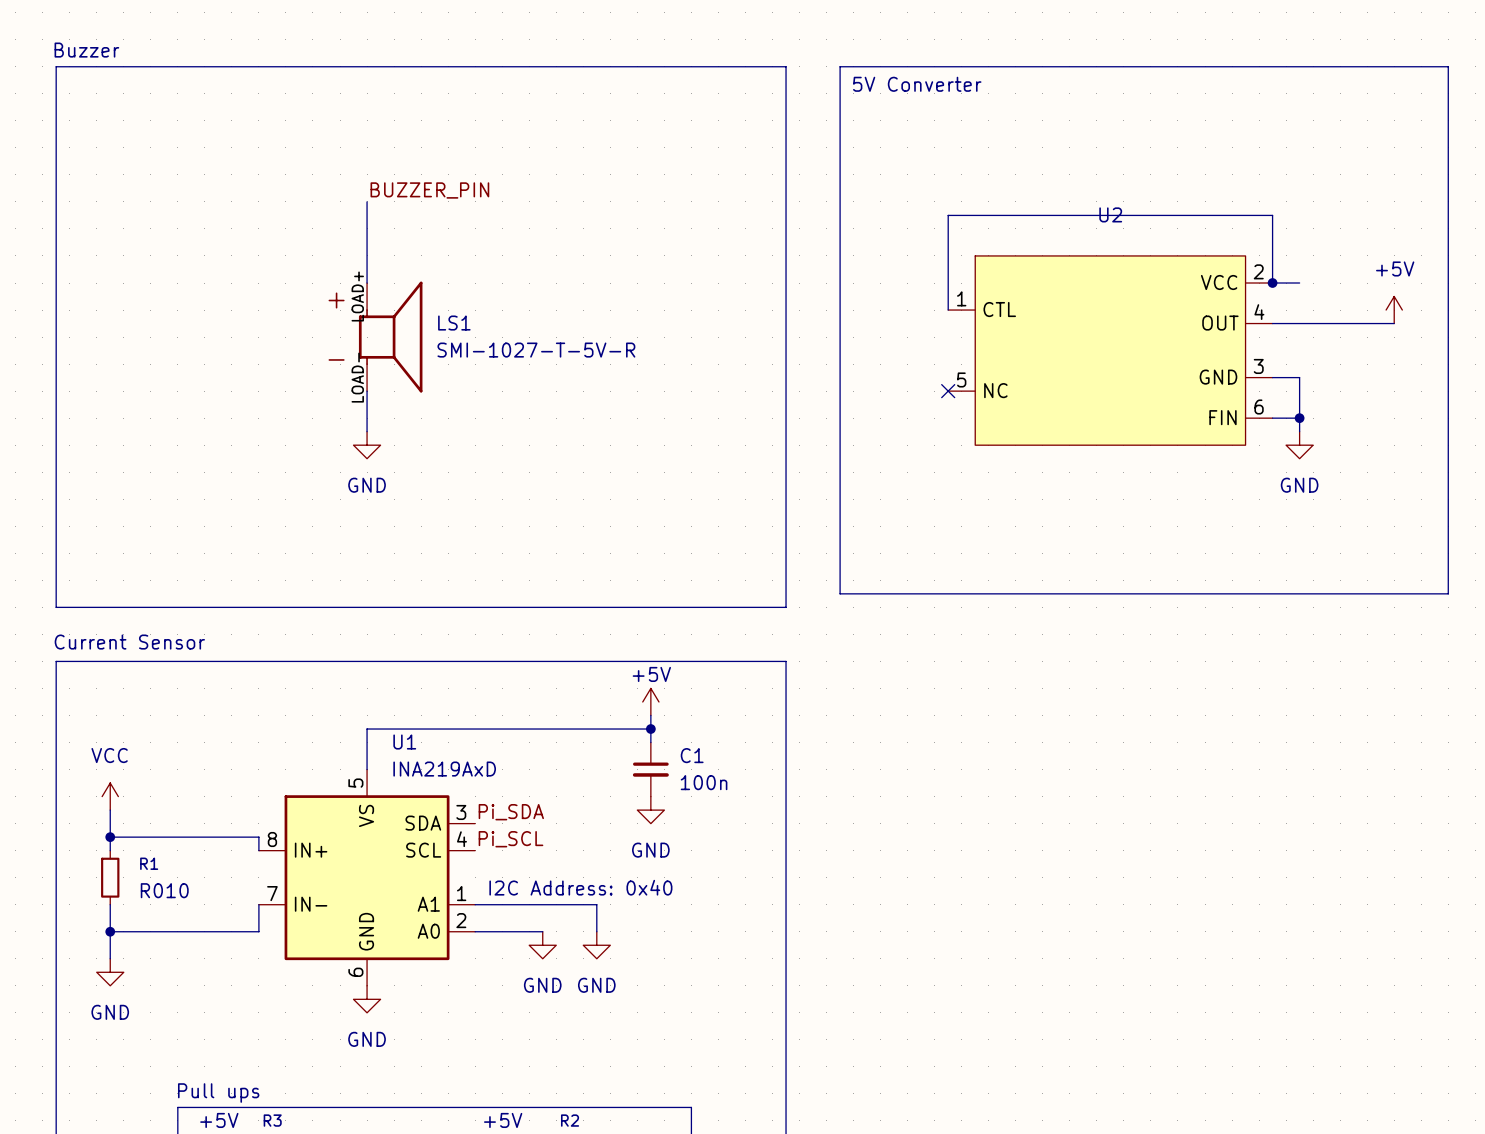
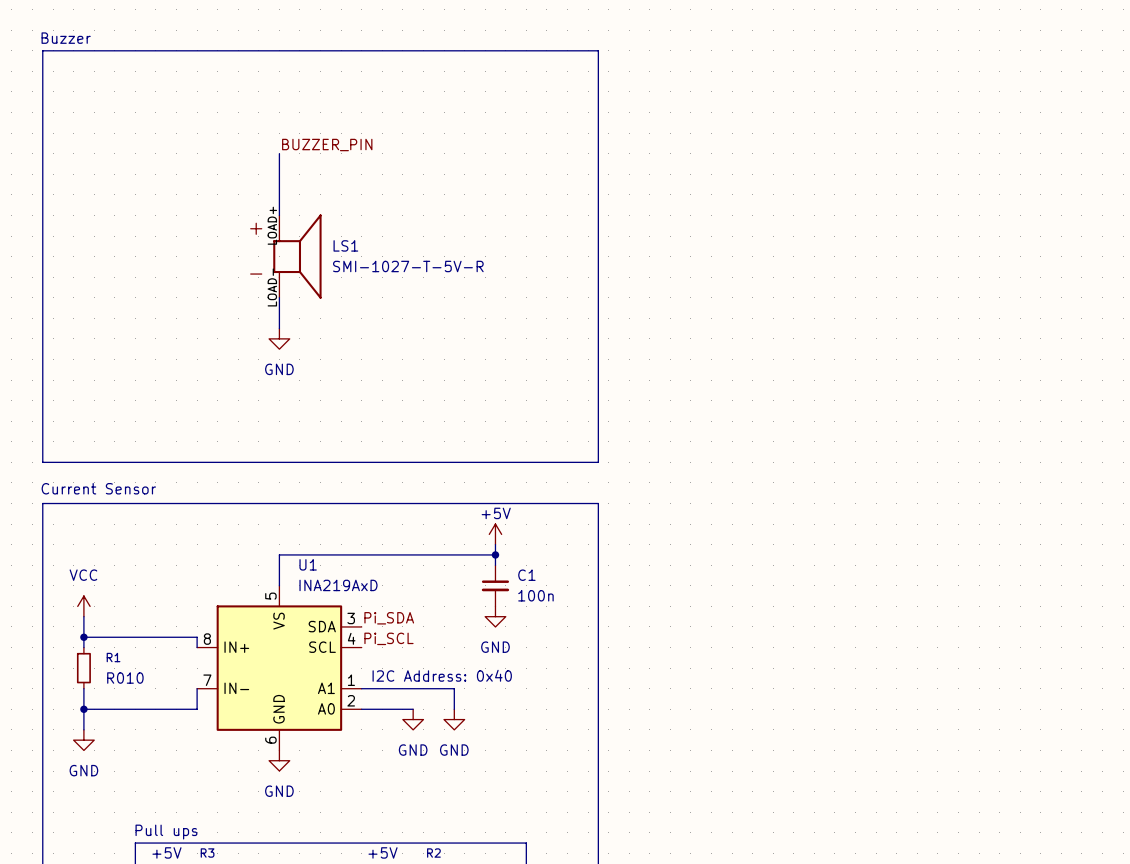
line: (840, 66) (1448, 66) (1448, 593) (840, 593) (840, 66) -> none
text: 5V Converter (917, 84) -> none
junction: (1272, 283) -> none
wire: (1299, 283) (1272, 283) (1272, 215) (948, 215) (948, 310) -> none
power symbol: +5V (1394, 310) -> none
wire: (1272, 323) (1394, 323) -> none
U2: (1110, 350) -> none
wire: (1272, 377) (1299, 377) (1299, 431) -> none
no-connect mark: (948, 391) -> none
wire: (1272, 418) (1299, 418) -> none
junction: (1299, 418) -> none
power symbol: GND (1299, 445) -> none

